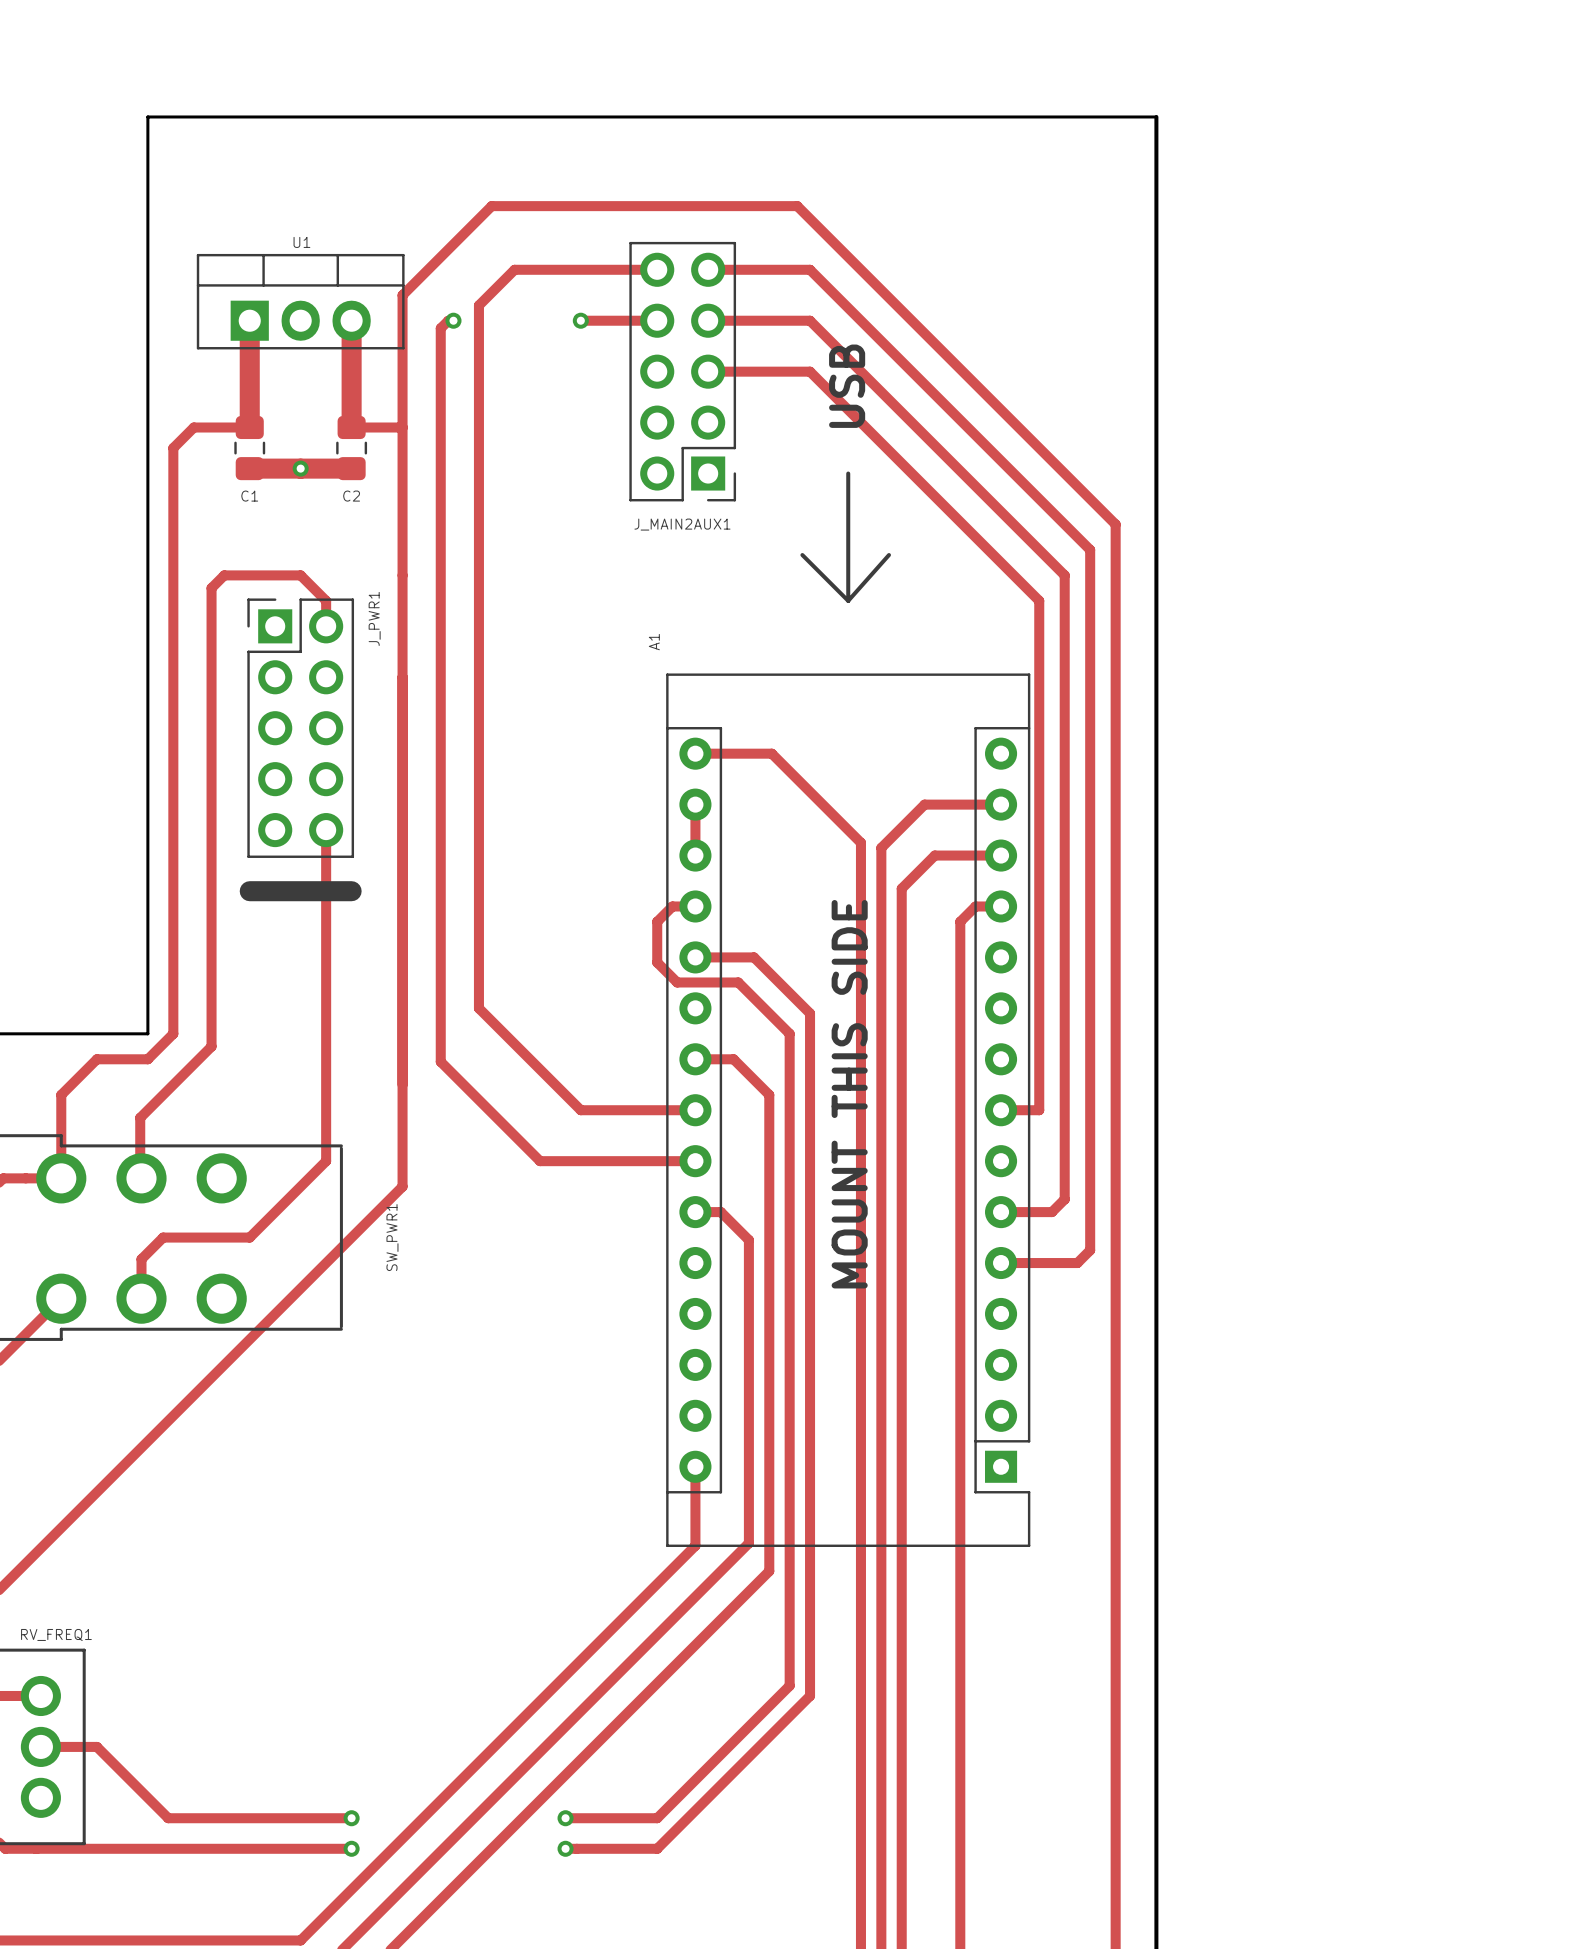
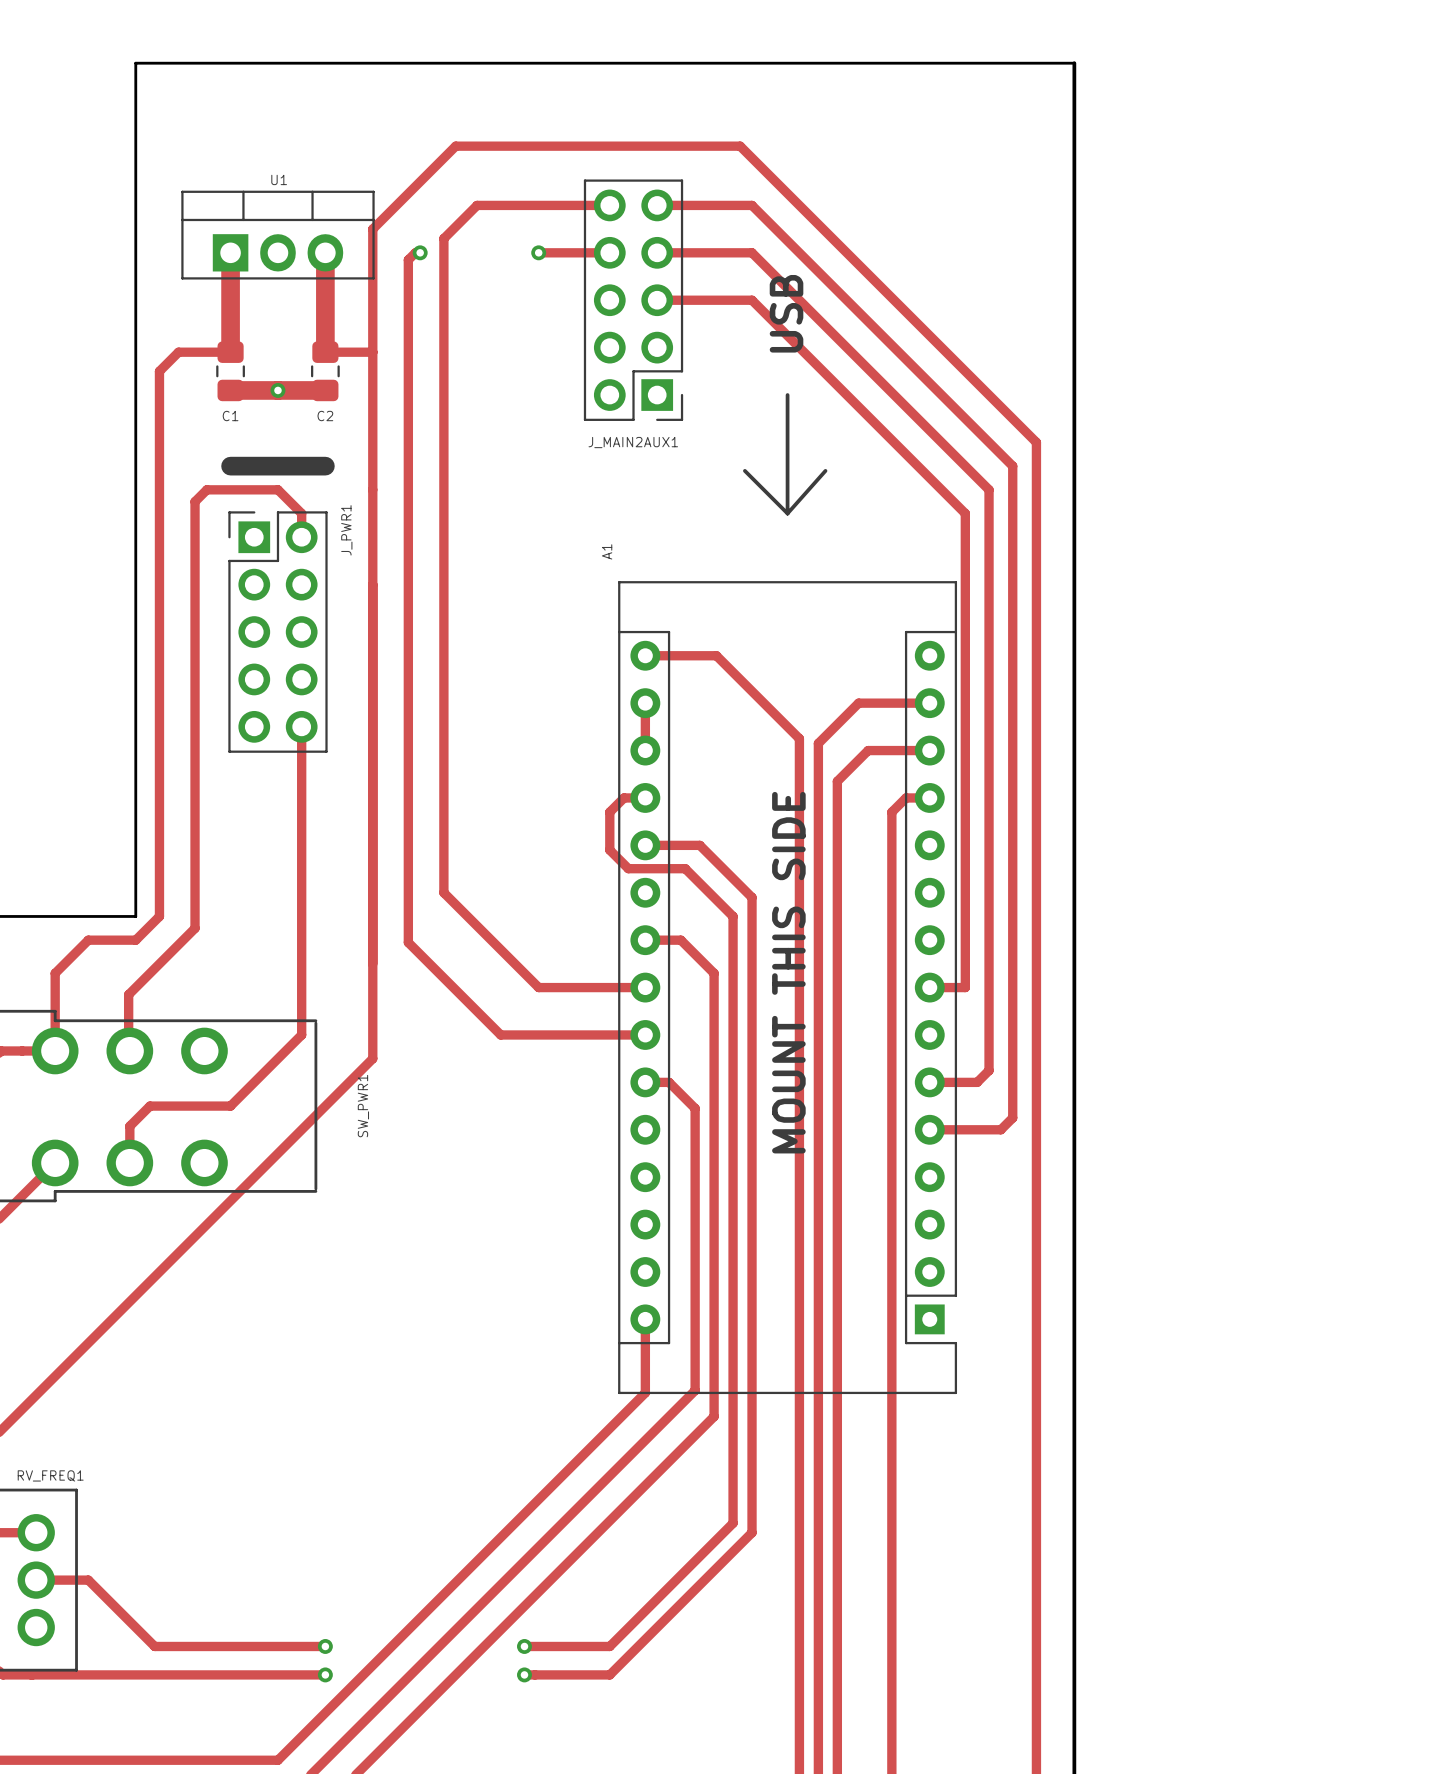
line: (249, 891) (351, 891) -> (230, 466) (325, 466)

